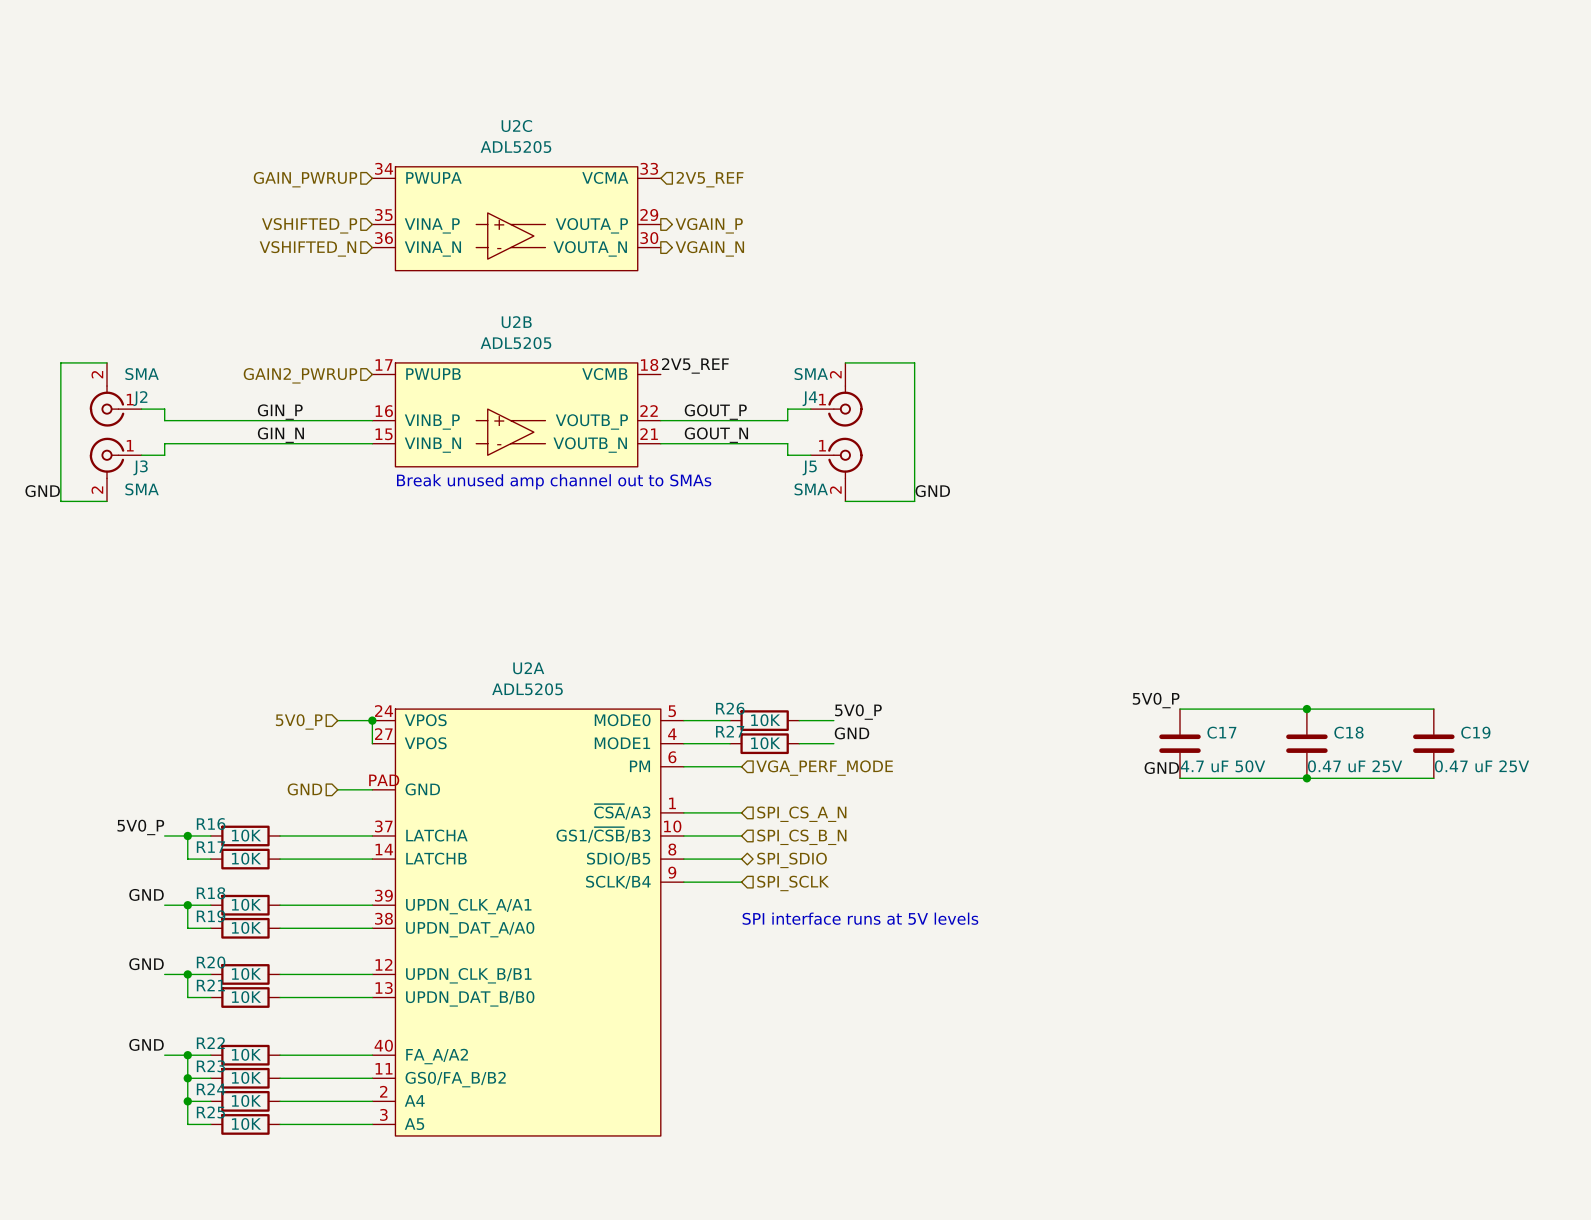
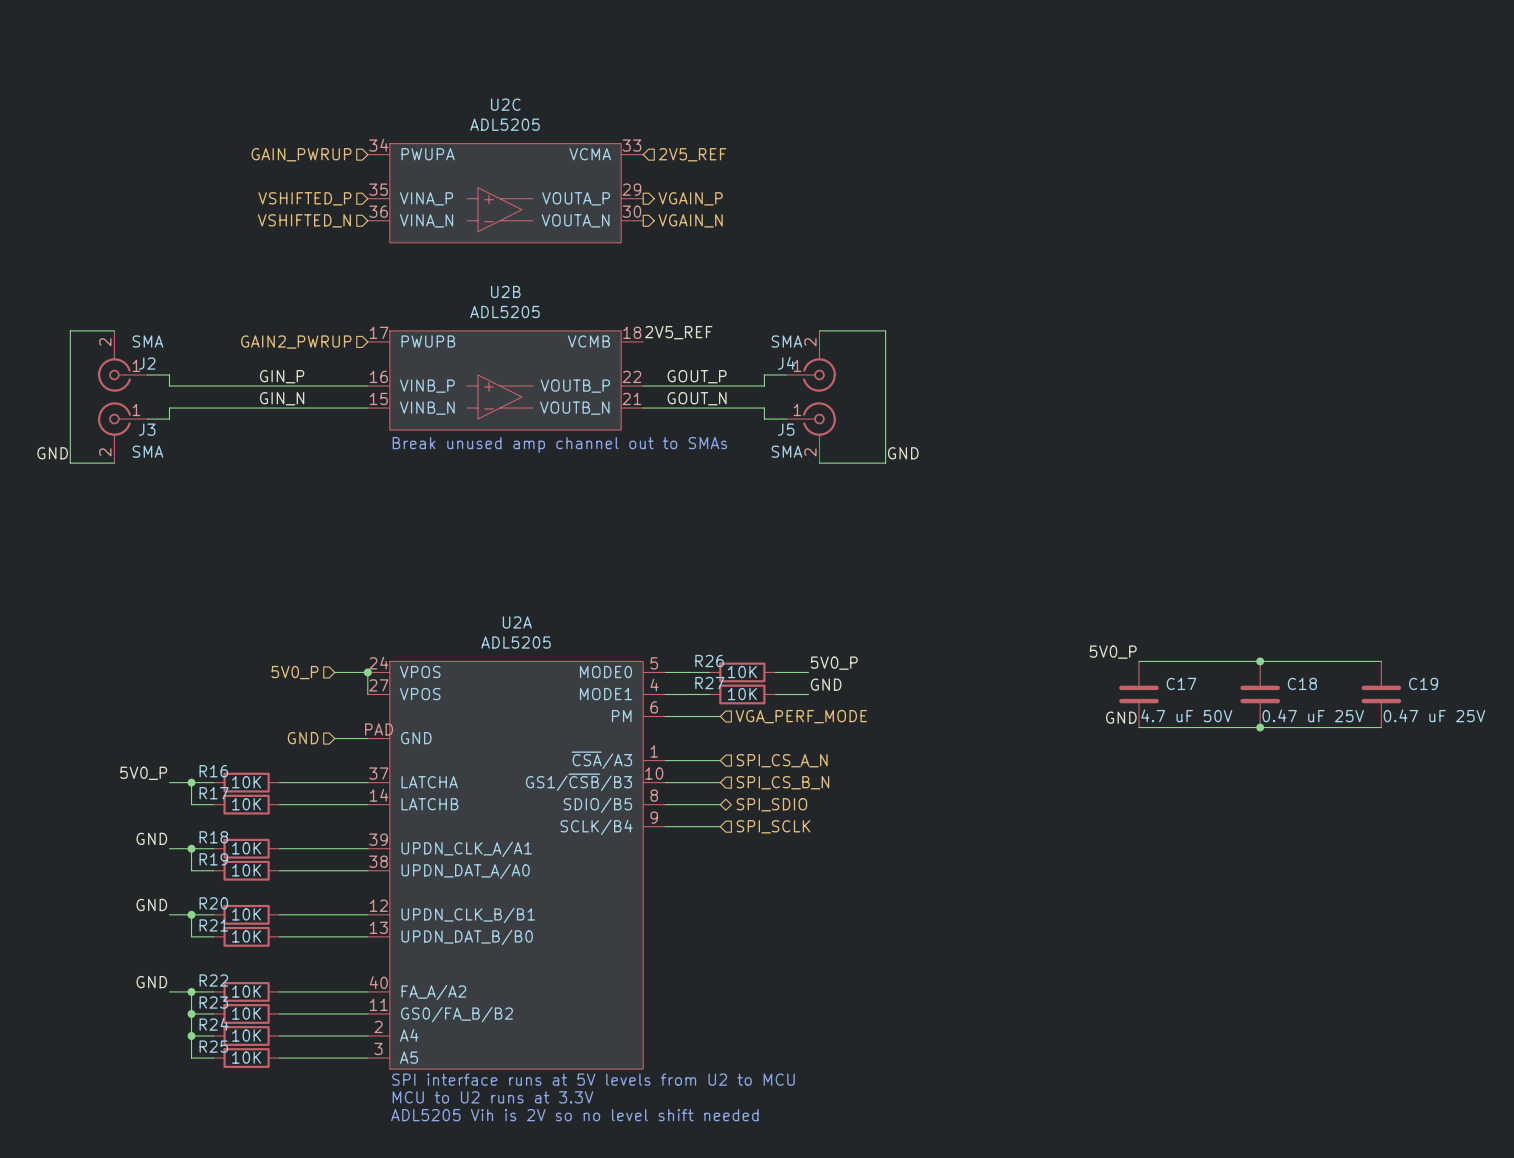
text: SPI interface runs at 5V levels (860, 918) -> none
text: none -> SPI interface runs at 5V levels from U2 to MCU (593, 1079)
text: none -> MCU to U2 runs at 3.3V (493, 1097)
text: none -> ADL5205 Vih is 2V so no level shift needed (574, 1115)

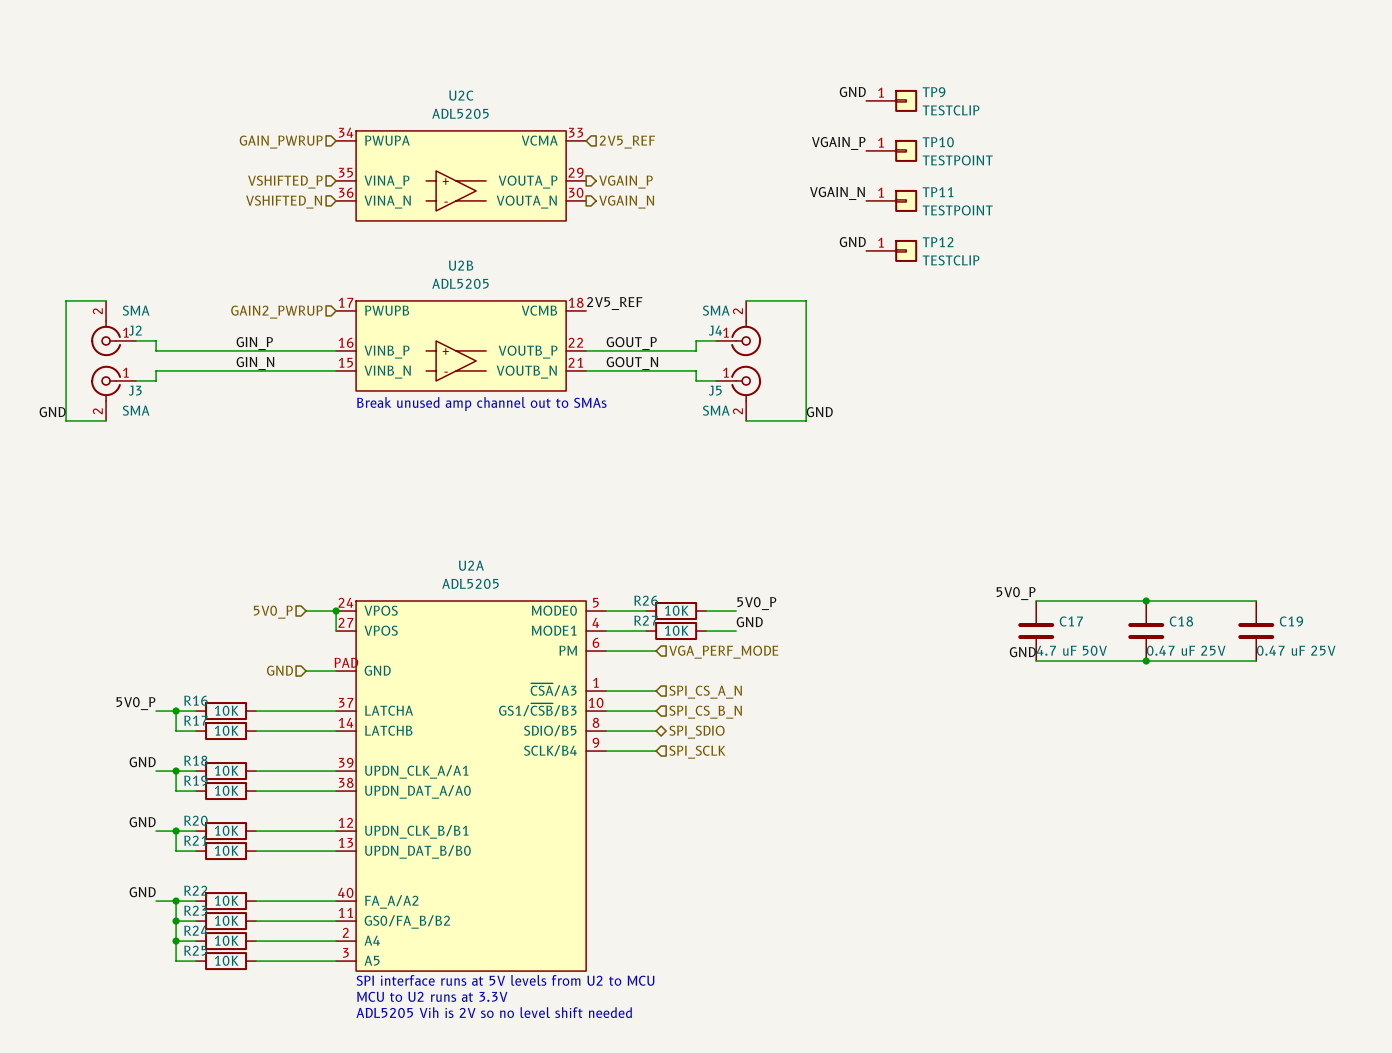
label: none -> GND (852, 92)
TP9: none -> TESTCLIP (891, 100)
label: none -> VGAIN_P (838, 143)
TP10: none -> TESTPOINT (891, 150)
label: none -> VGAIN_N (837, 193)
TP11: none -> TESTPOINT (891, 200)
label: none -> GND (852, 242)
TP12: none -> TESTCLIP (891, 250)

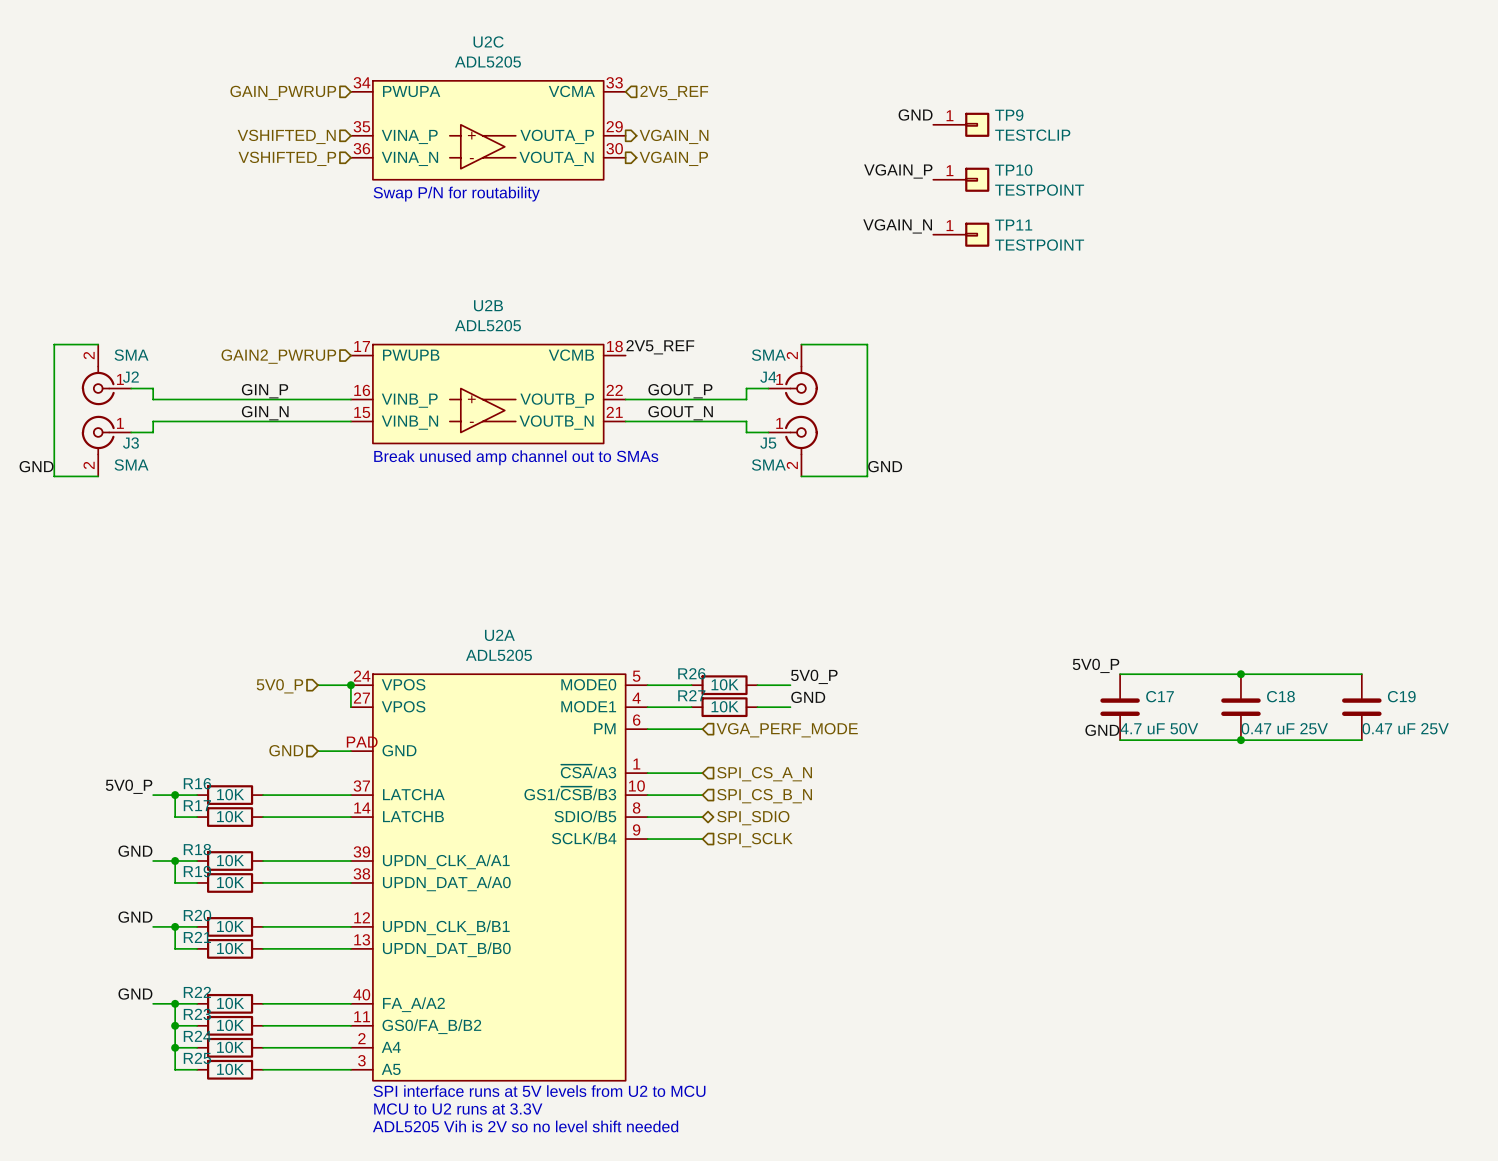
hierarchical label position: GAIN_PWRUP (281, 142) -> GAIN_PWRUP (283, 92)
hierarchical label position: 2V5_REF (627, 142) -> 2V5_REF (674, 92)
text: none -> Swap P/N for routability (456, 194)
U2C position: (461, 175) -> (488, 130)
hierarchical label position: VSHIFTED_P (285, 182) -> VSHIFTED_P (287, 158)
hierarchical label position: VGAIN_P (626, 182) -> VGAIN_P (673, 158)
hierarchical label position: VSHIFTED_N (284, 202) -> VSHIFTED_N (286, 136)
hierarchical label position: VGAIN_N (626, 202) -> VGAIN_N (674, 136)
label: GND (852, 242) -> none
TP12: TESTCLIP (891, 250) -> none

